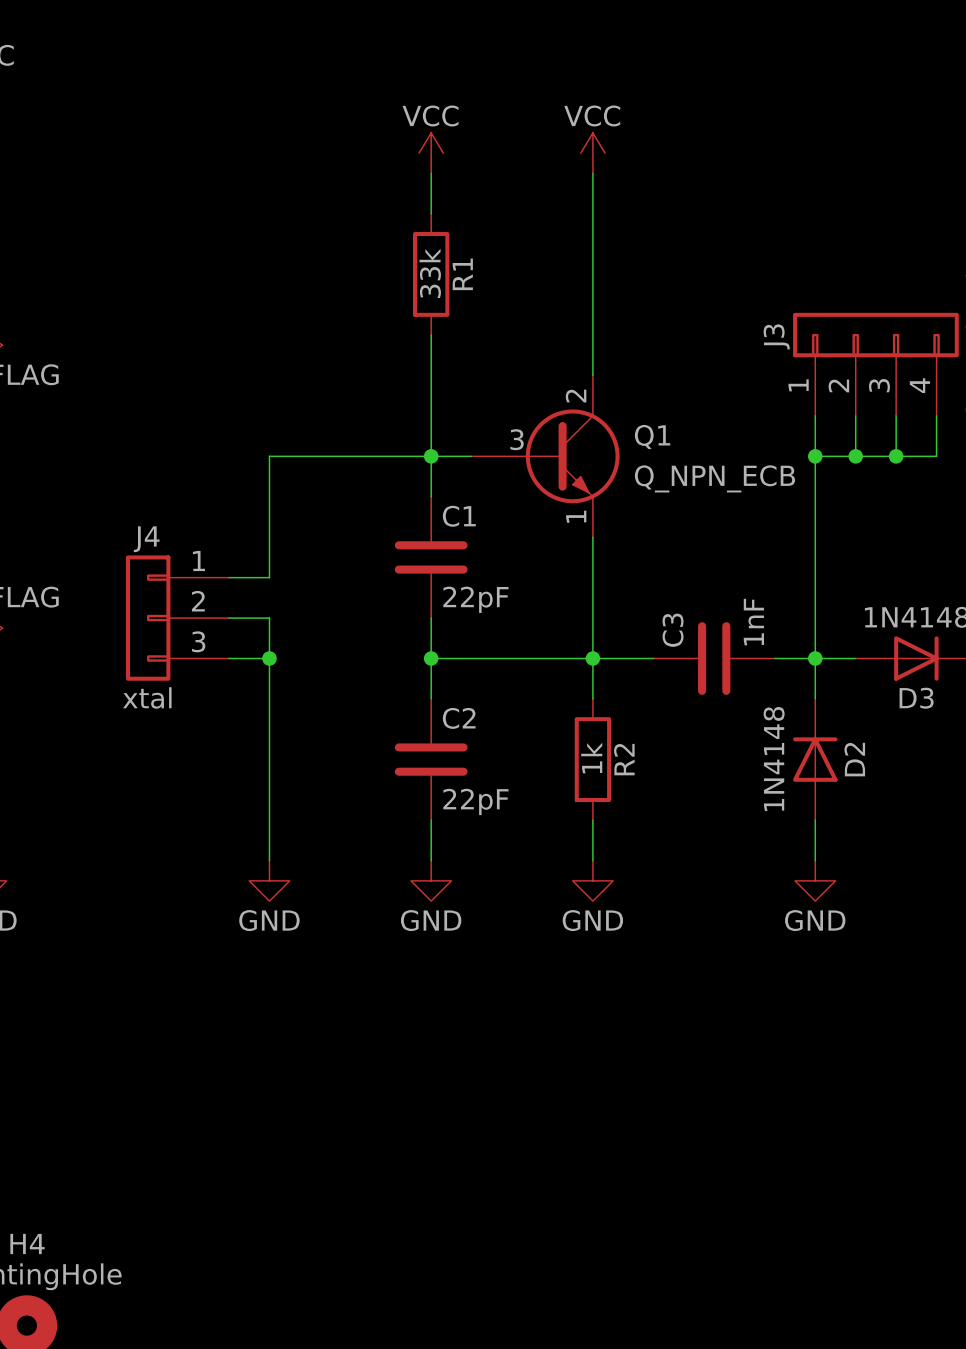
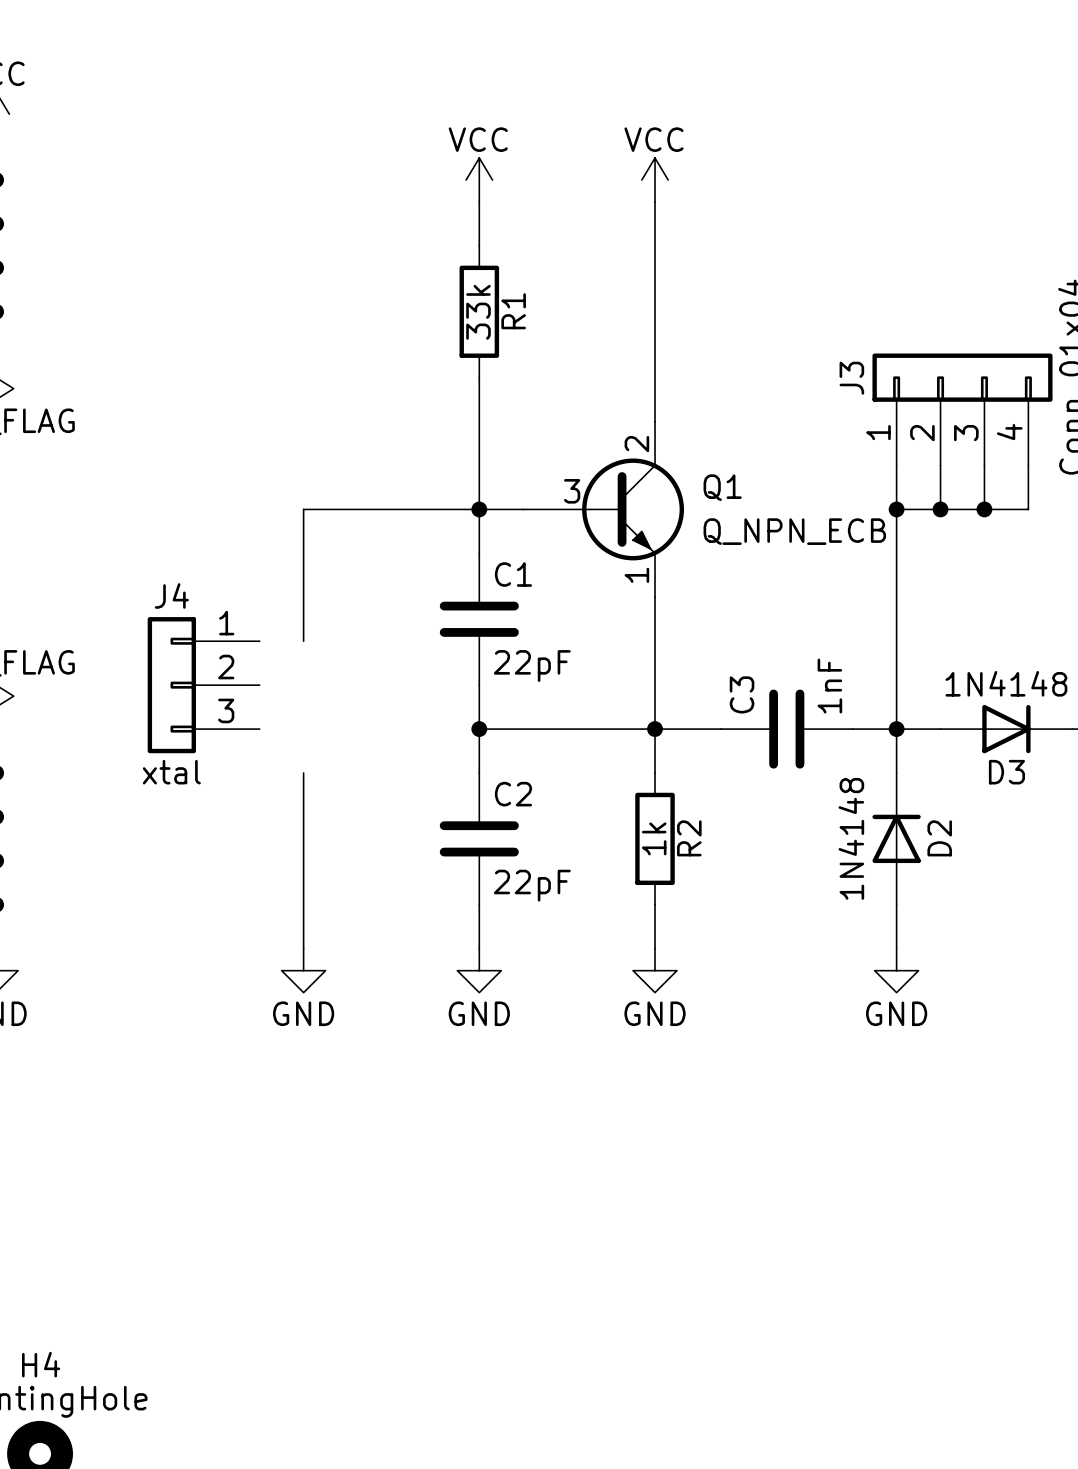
wire: (229, 577) (269, 577) -> none
wire: (229, 618) (269, 618) (269, 698) -> none
wire: (229, 658) (269, 658) -> none
junction: (269, 658) -> none

